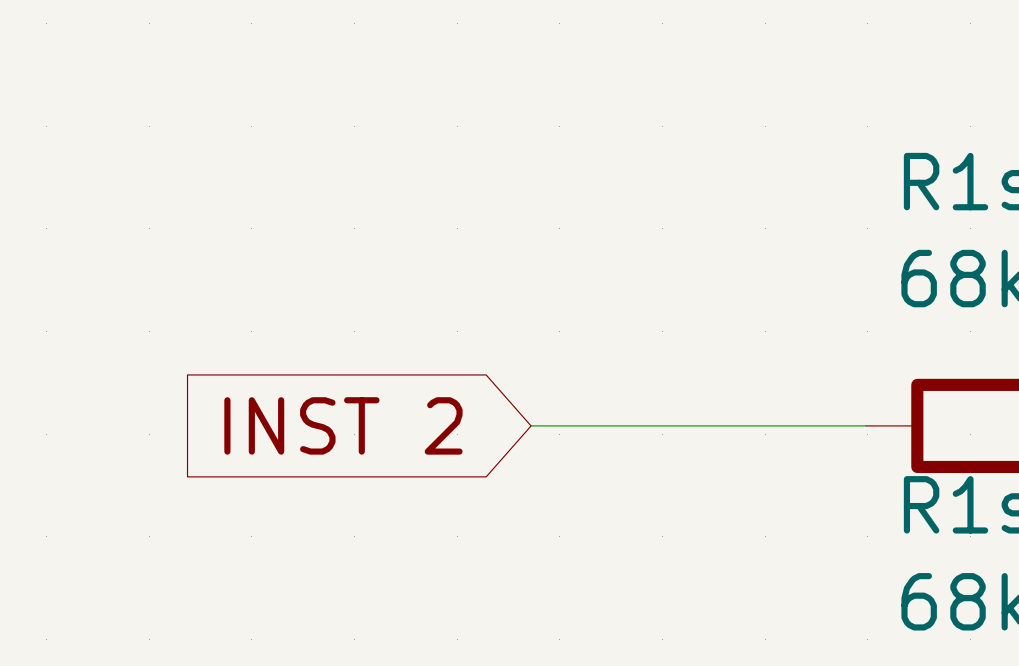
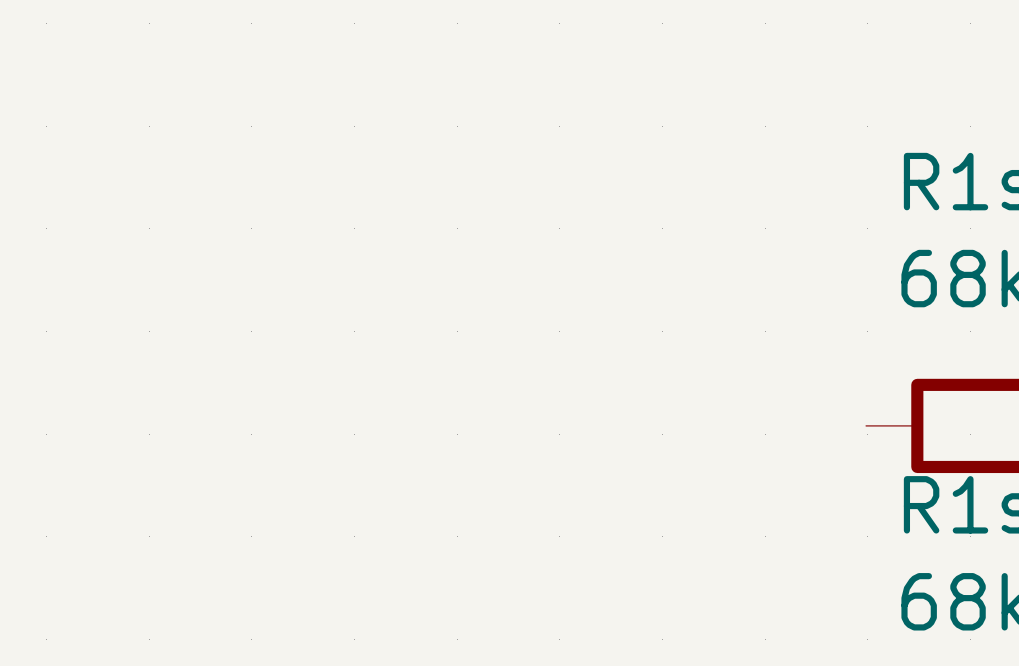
global label: INST 2 (343, 425) -> none
wire: (531, 425) (866, 425) -> none

